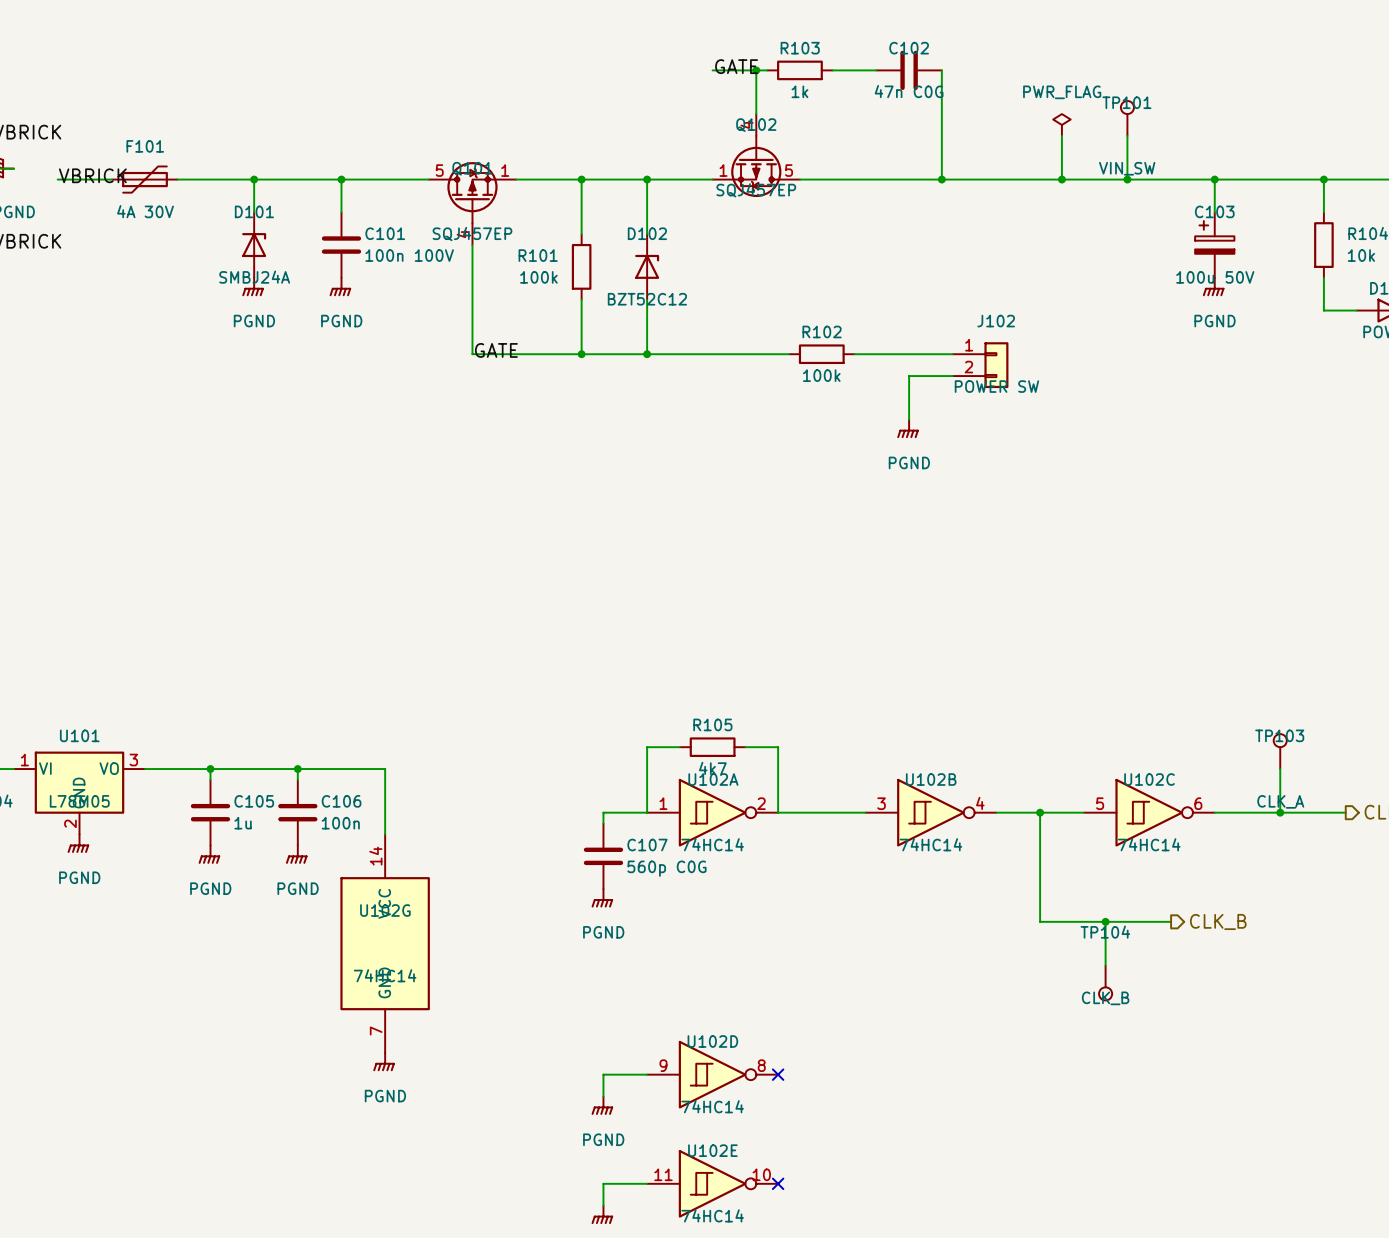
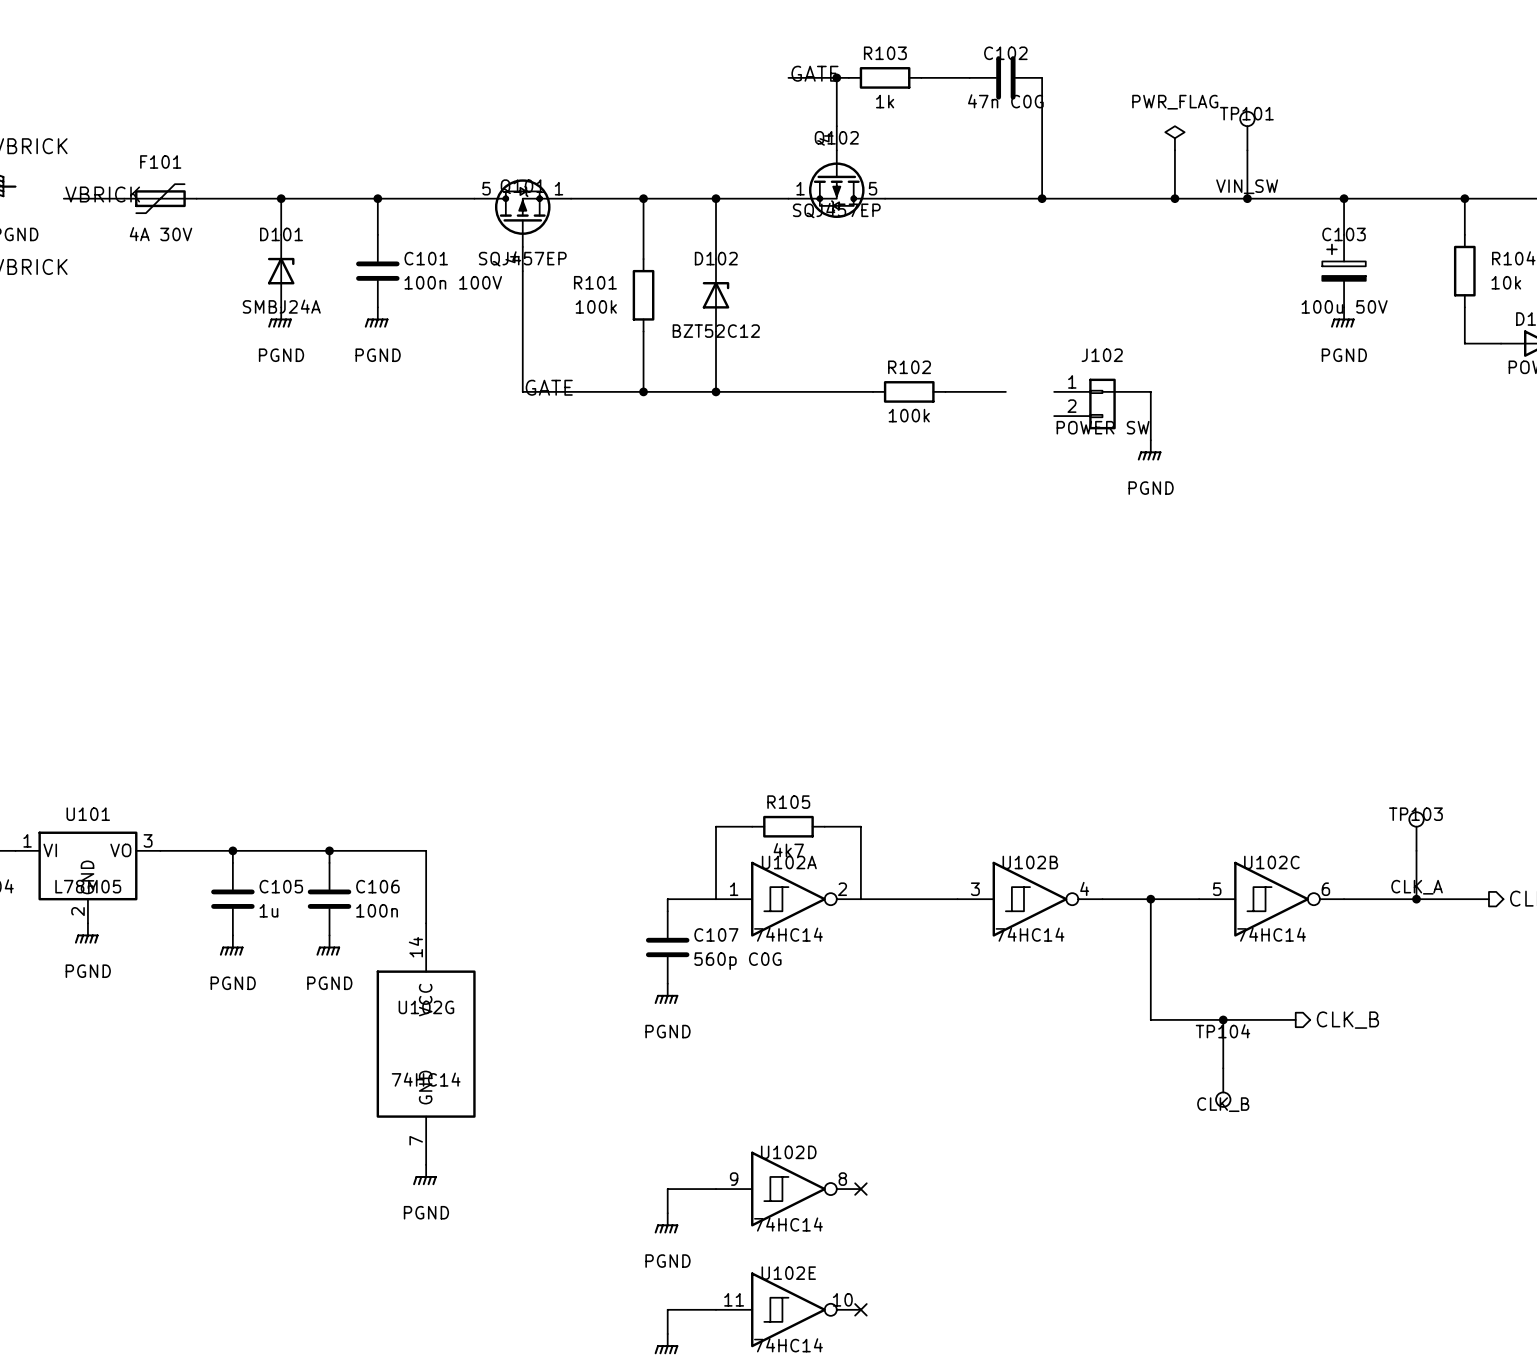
wire: (909, 354) (952, 354) -> none
wire: none -> (1102, 391) (1150, 391) (1150, 440)
wire: (952, 376) (909, 376) (909, 419) -> none
power symbol position: PGND (908, 428) -> PGND (1149, 450)

